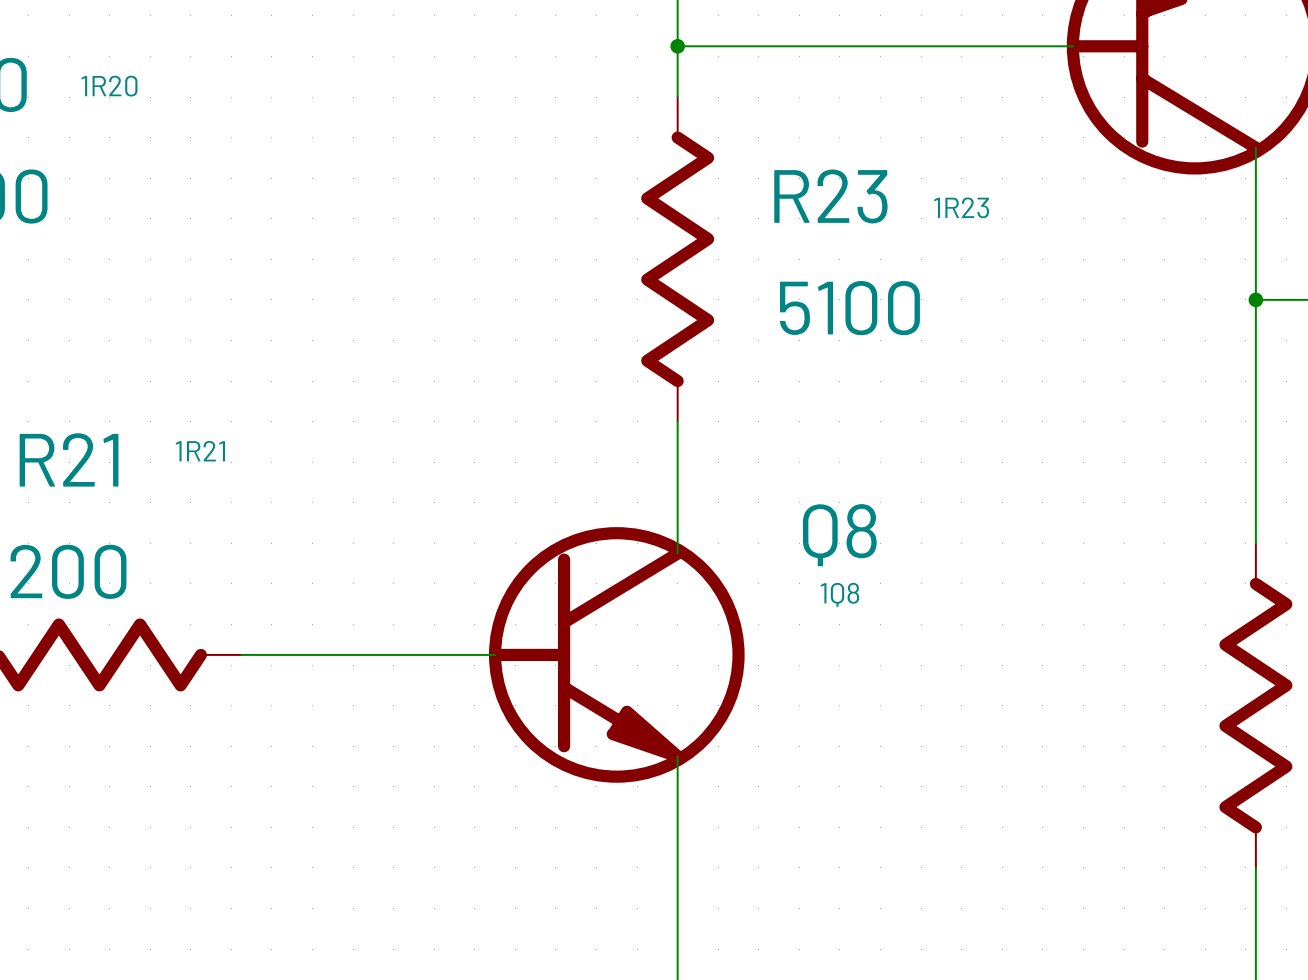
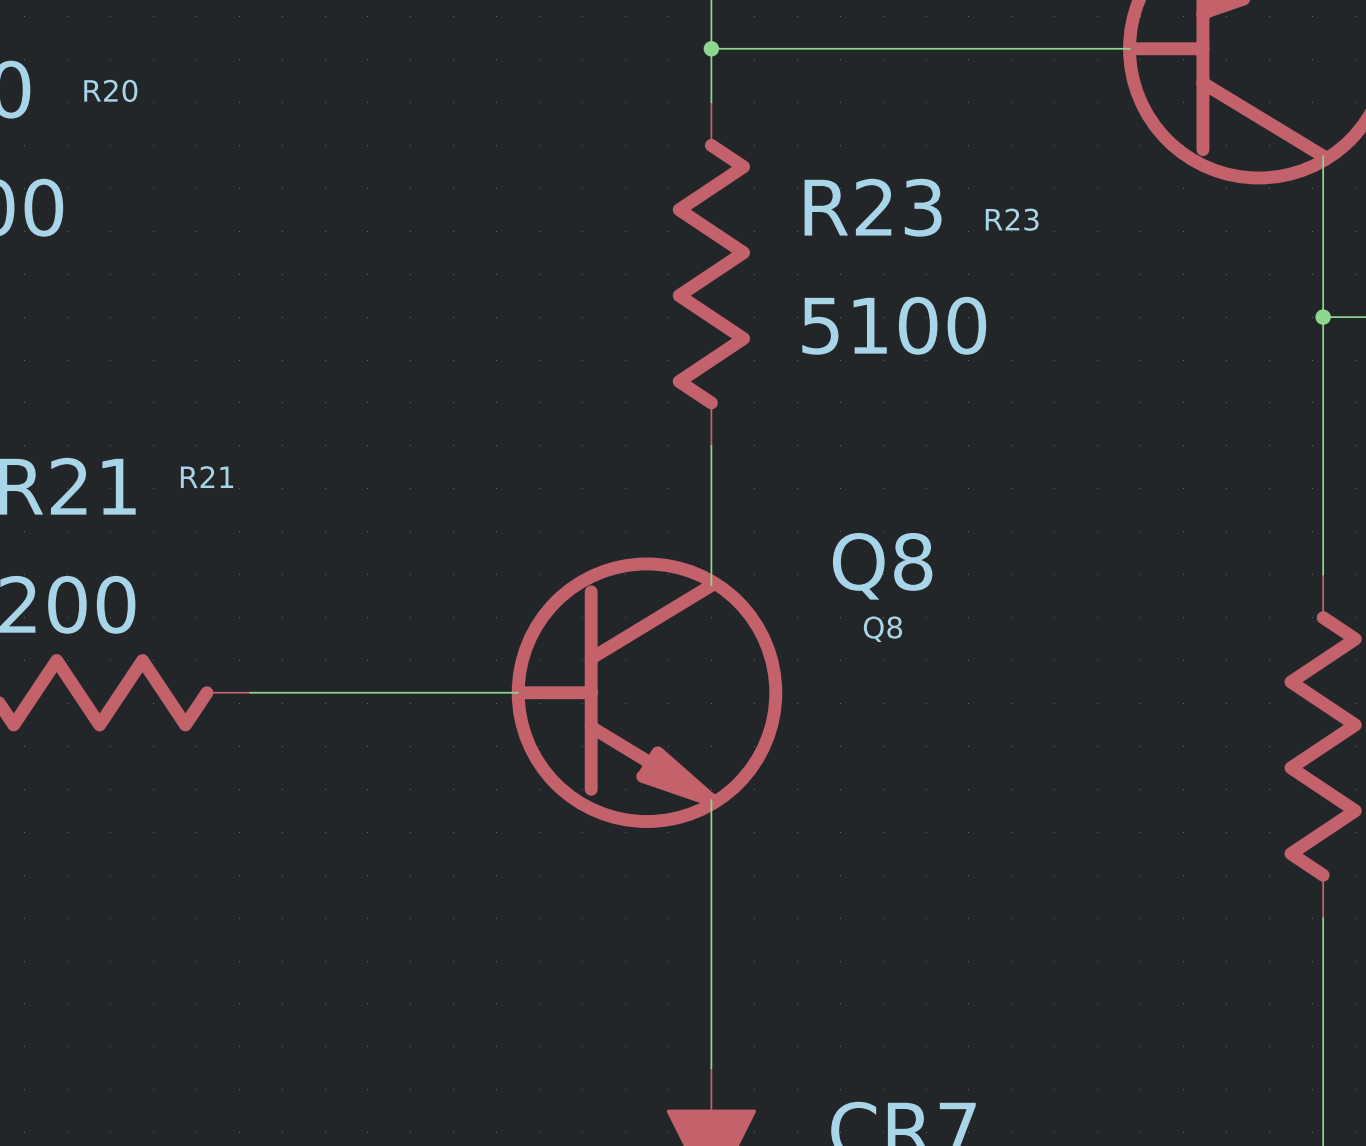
1R20 name: 1R20 (109, 86) -> R20 (110, 90)
1R23 name: 1R23 (961, 207) -> R23 (1012, 219)
1R21 name: 1R21 (200, 451) -> R21 (207, 477)
1Q8 name: 1Q8 (839, 594) -> Q8 (882, 629)

